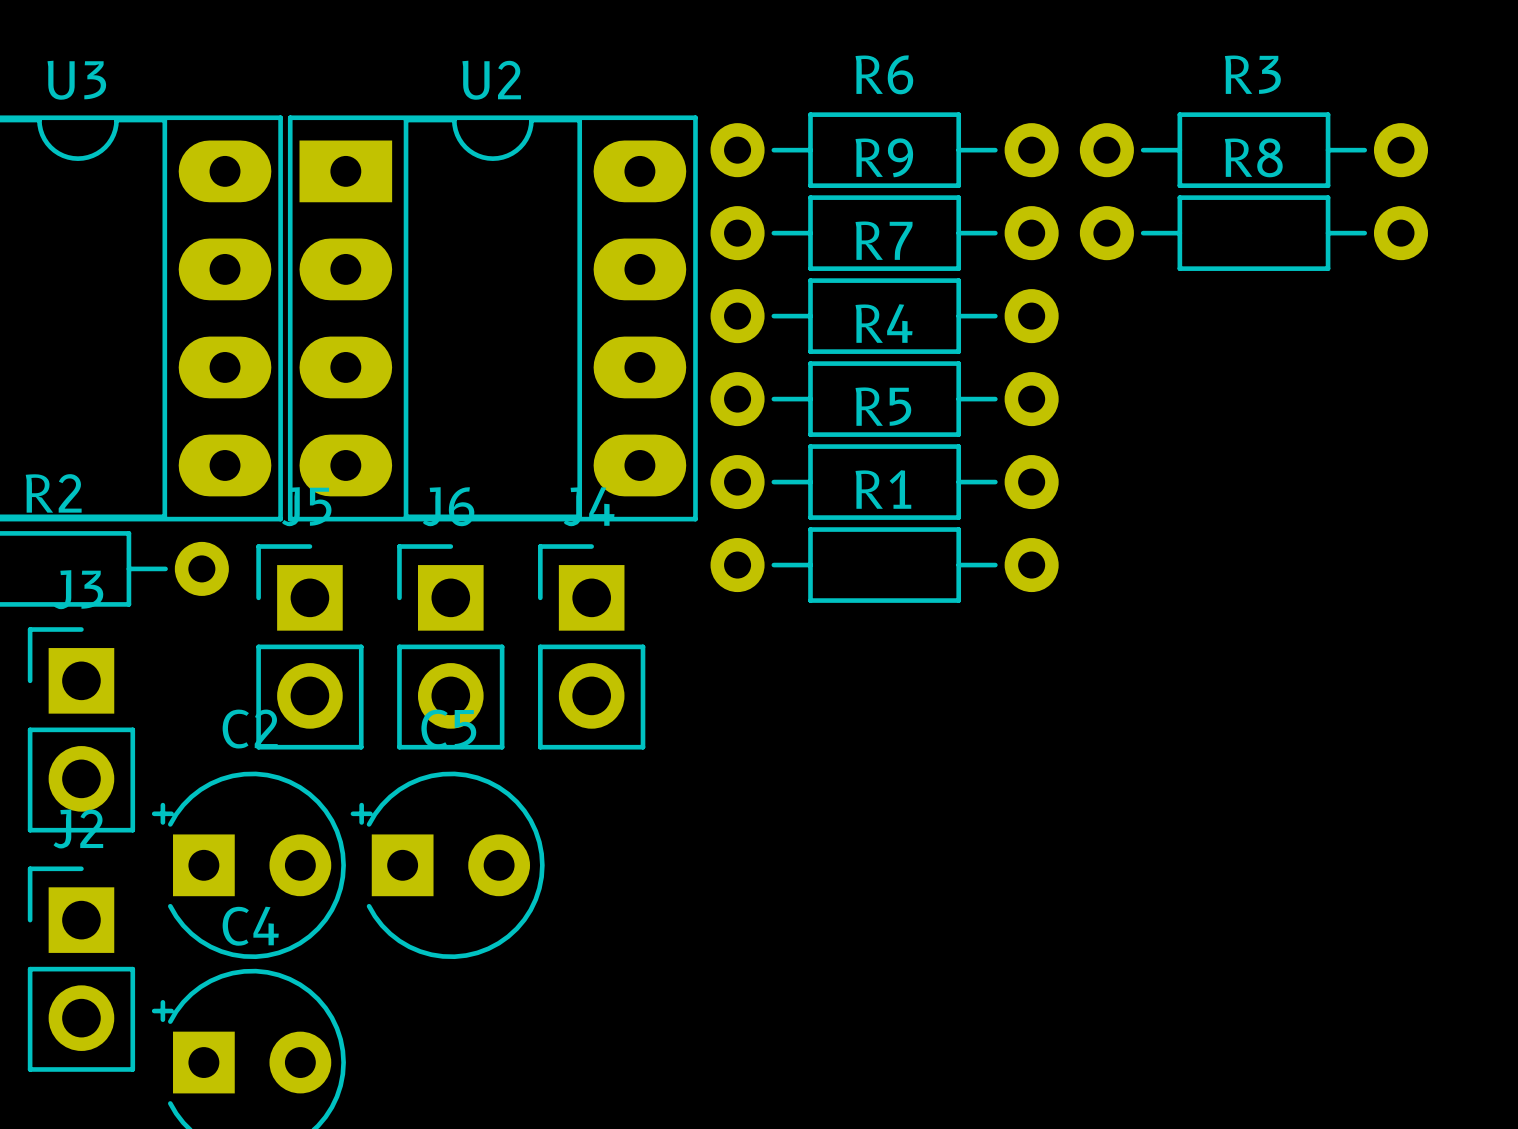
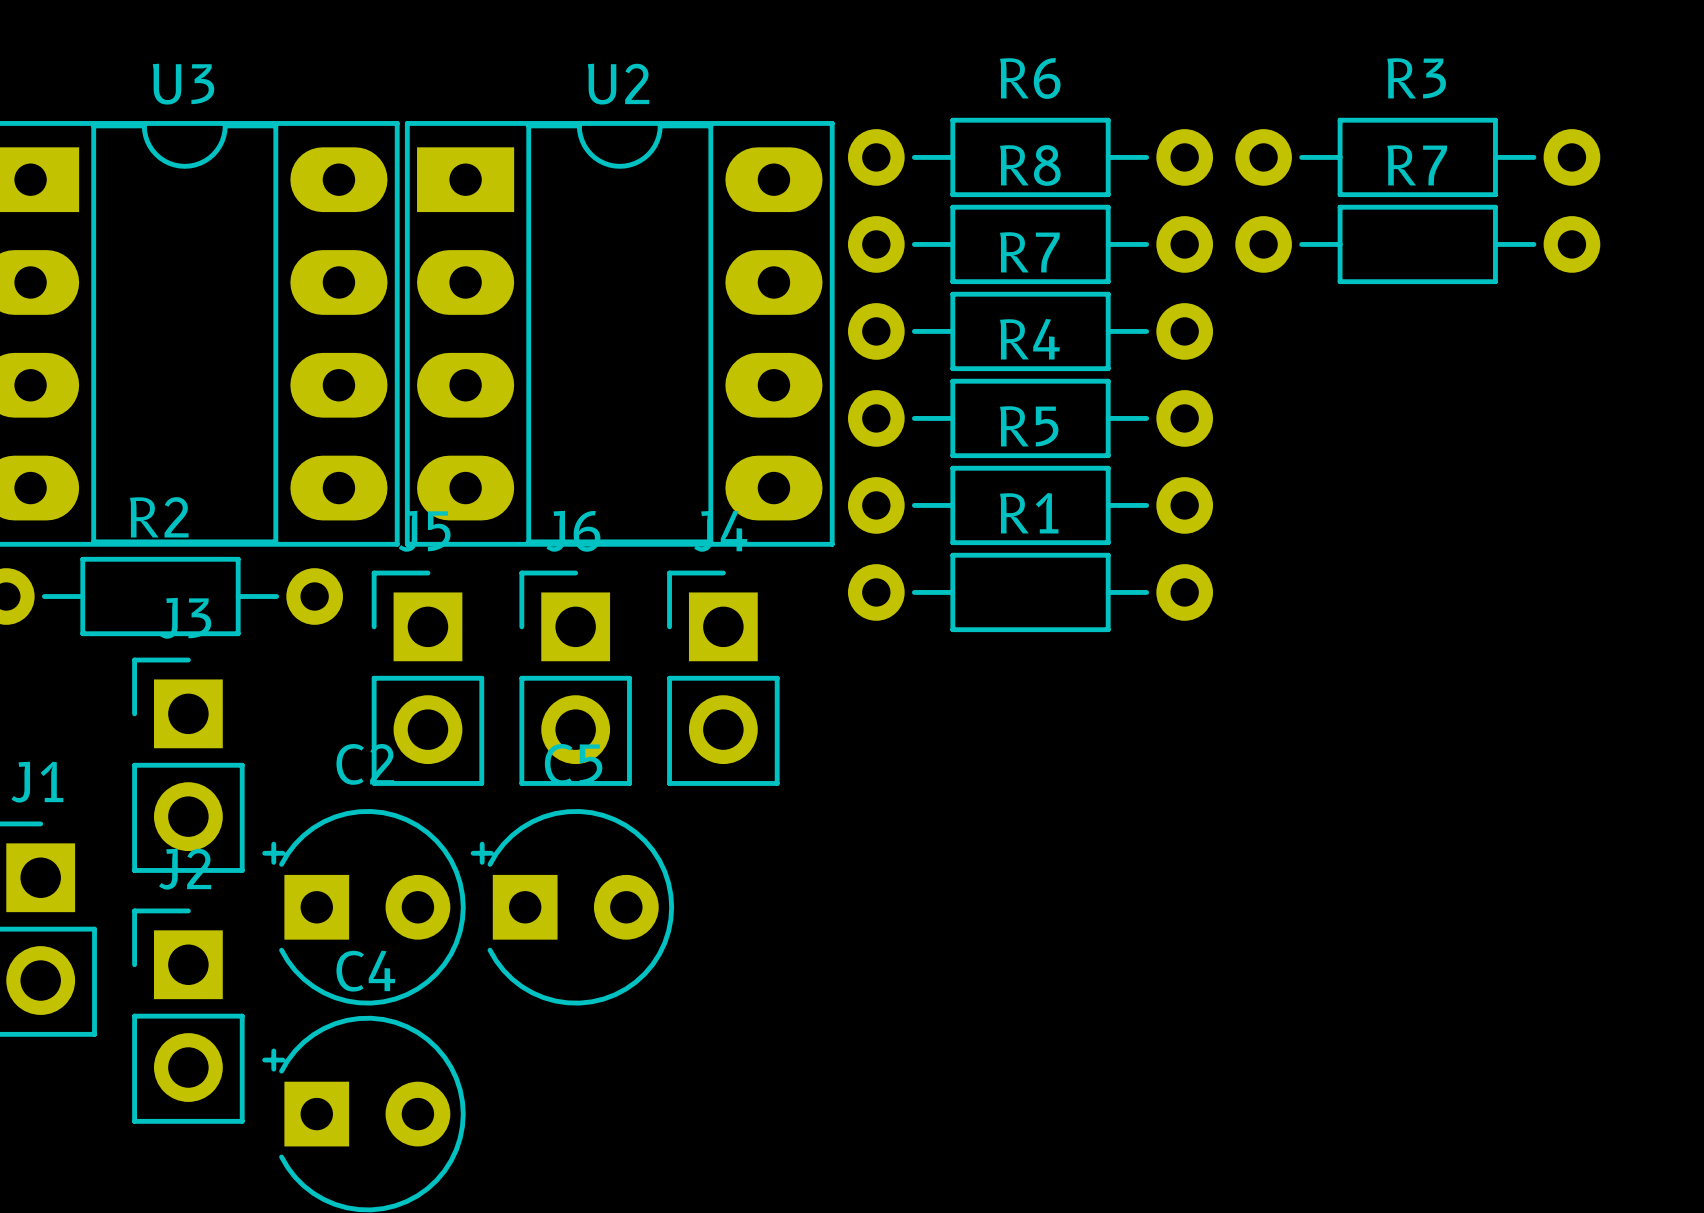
R9 name: R9 (884, 157) -> R8 (1030, 165)
R8 name: R8 (1253, 157) -> R7 (1417, 165)

